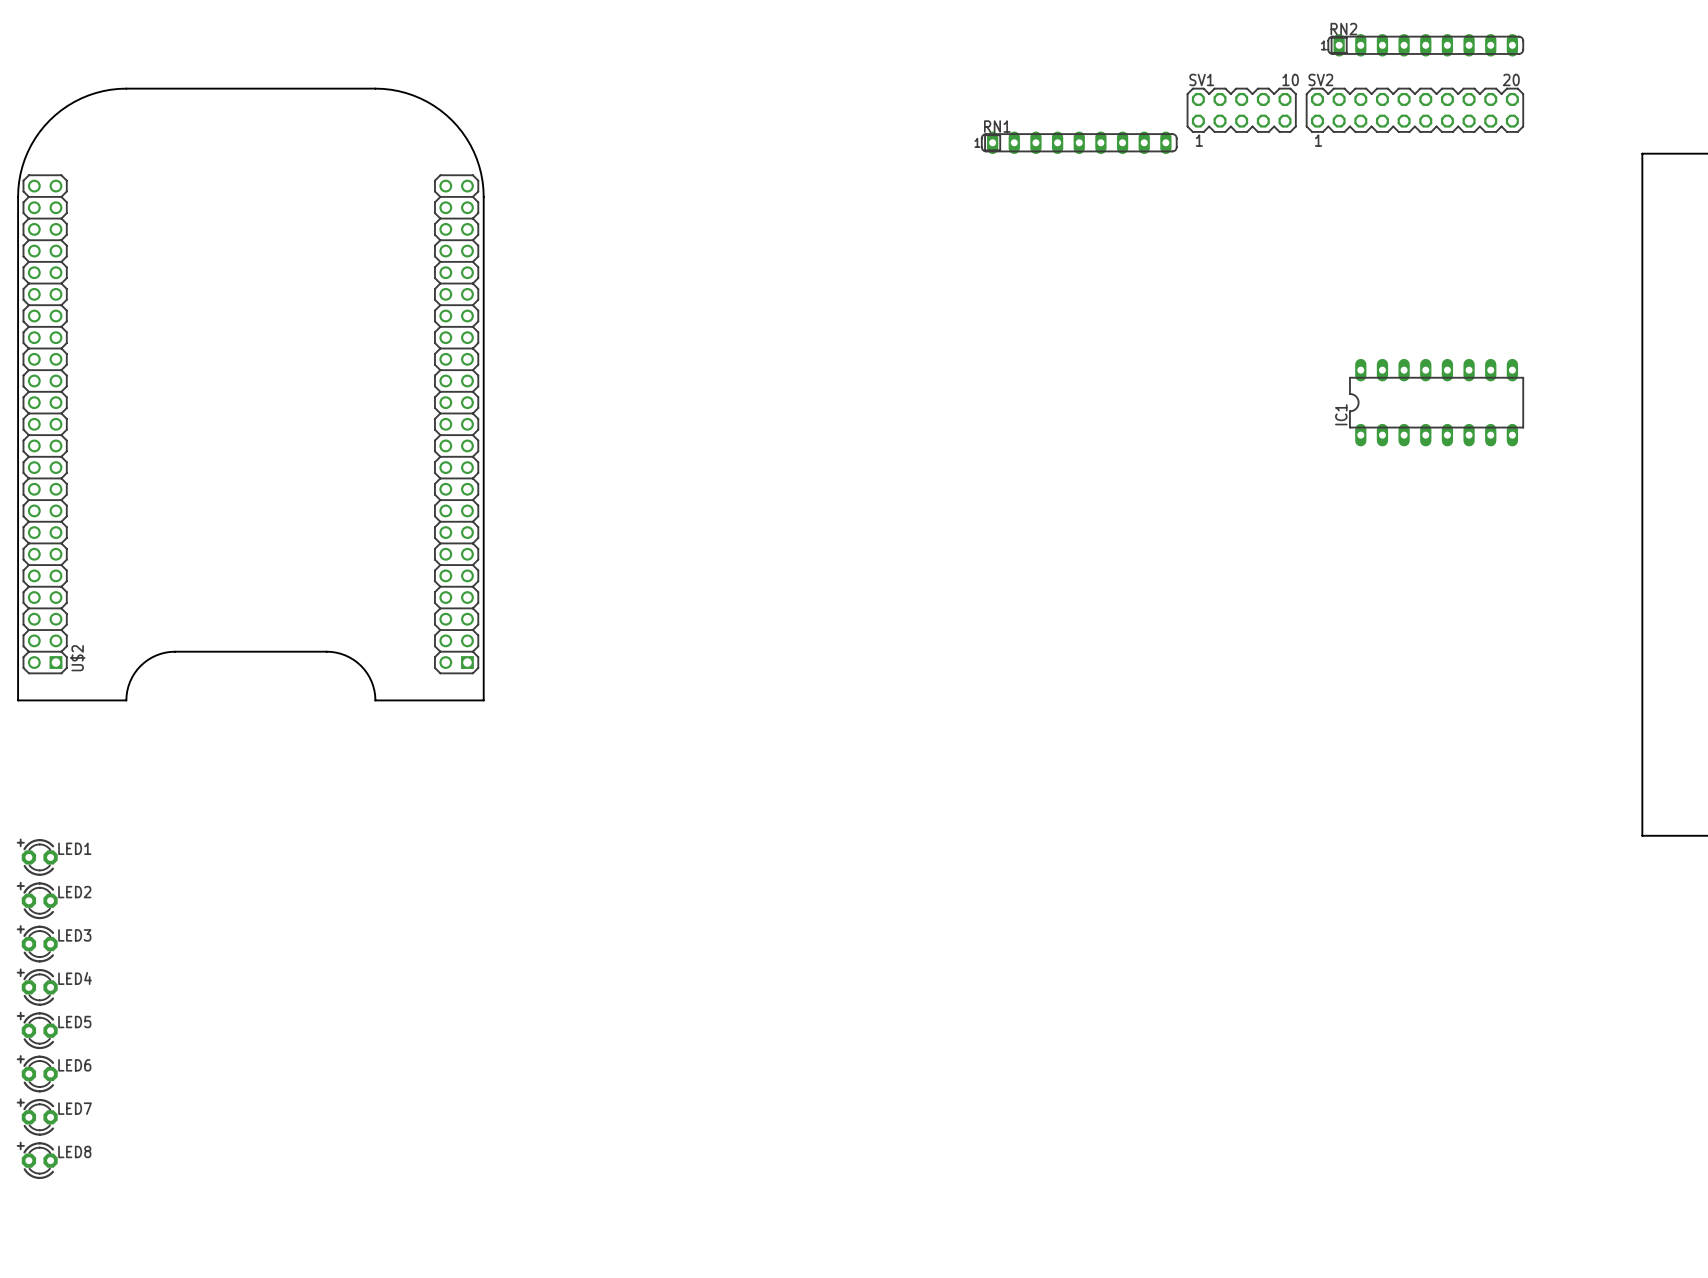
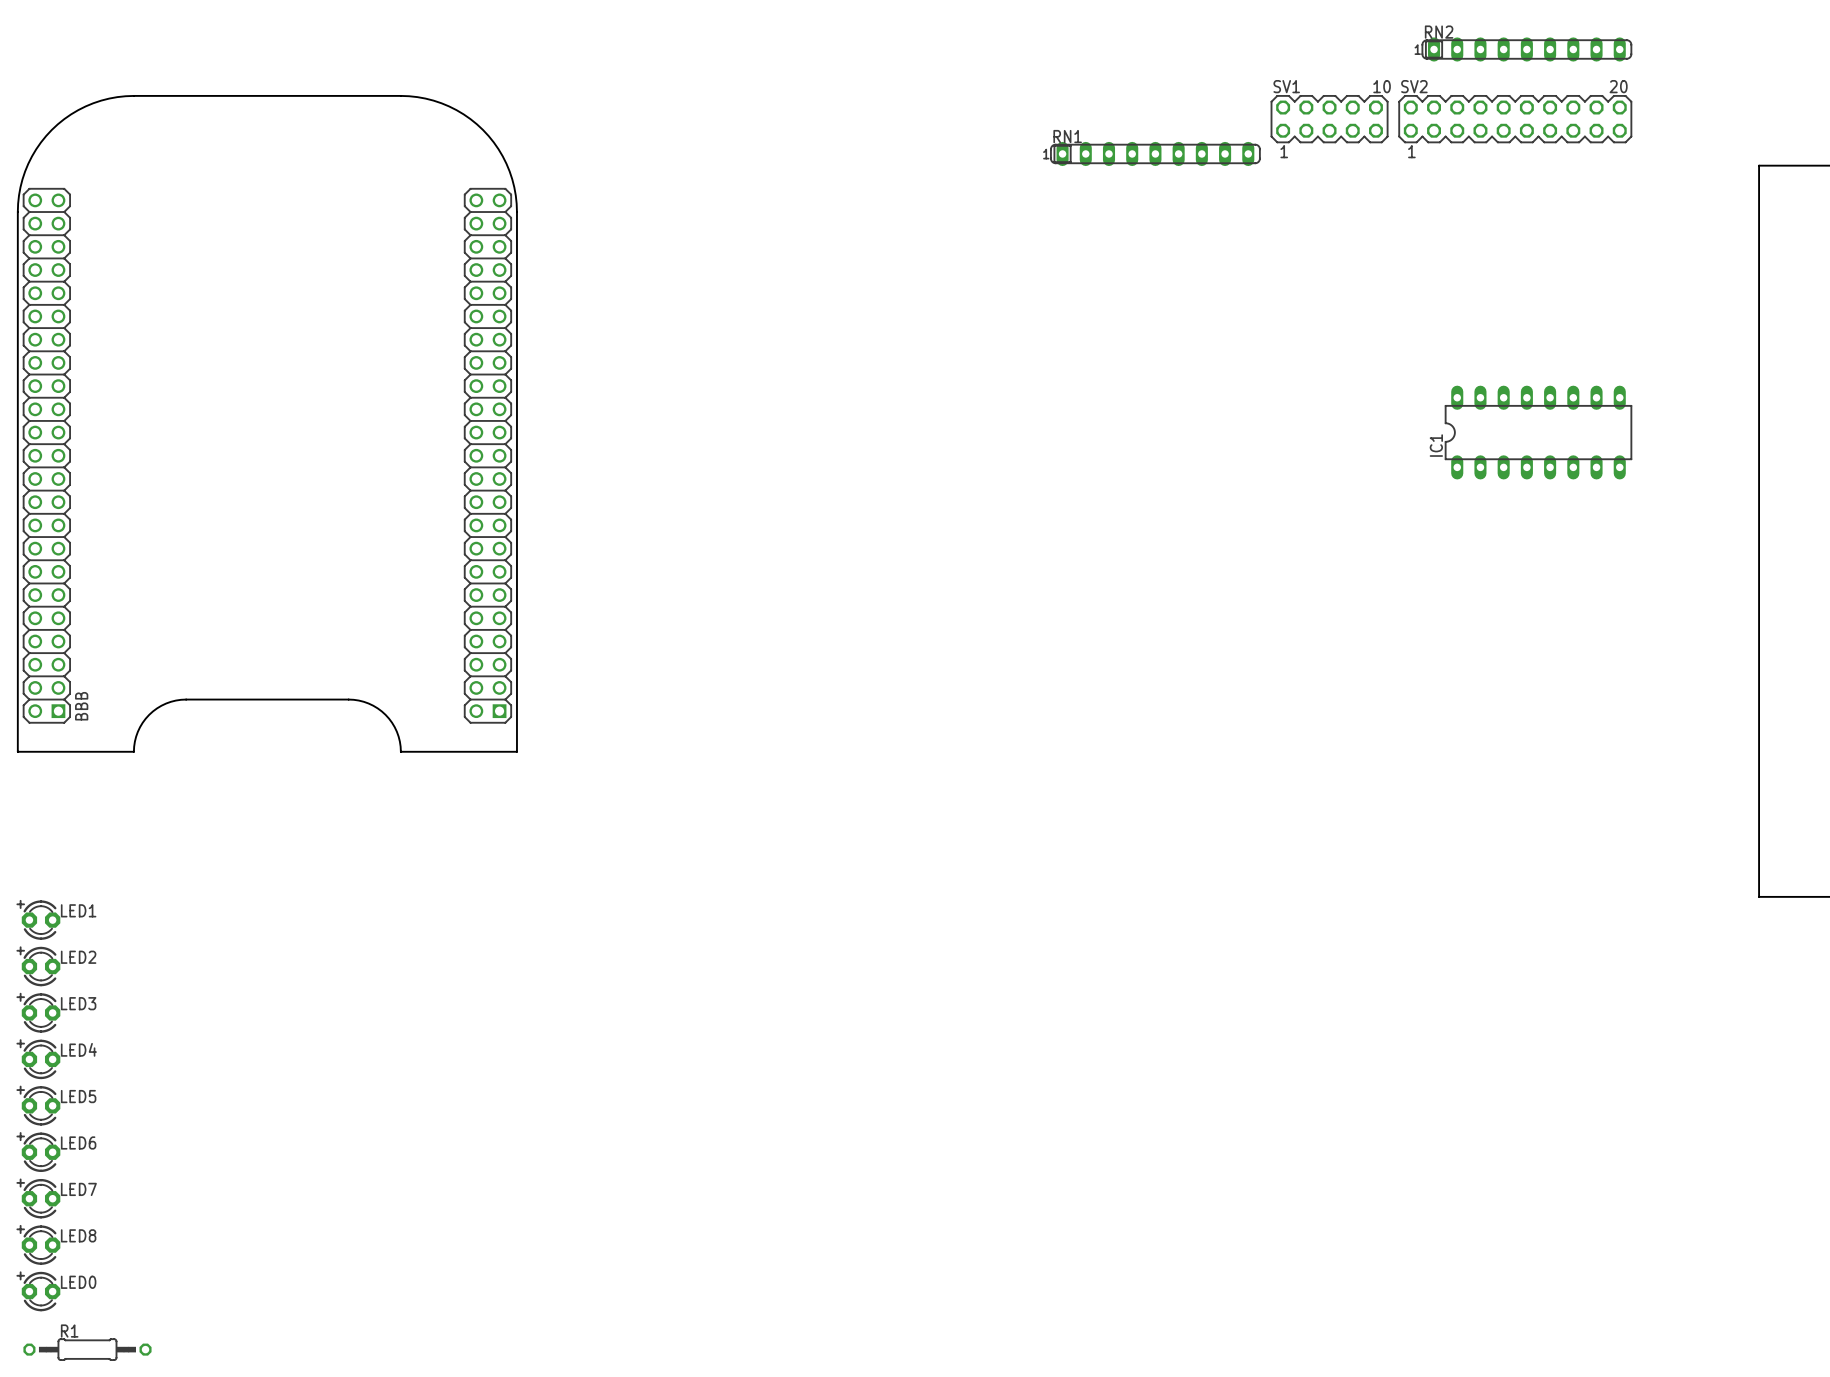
U$2 name: U$2 (77, 658) -> BBB (81, 706)
LED0: none -> (38, 1291)
R1: none -> (87, 1349)

